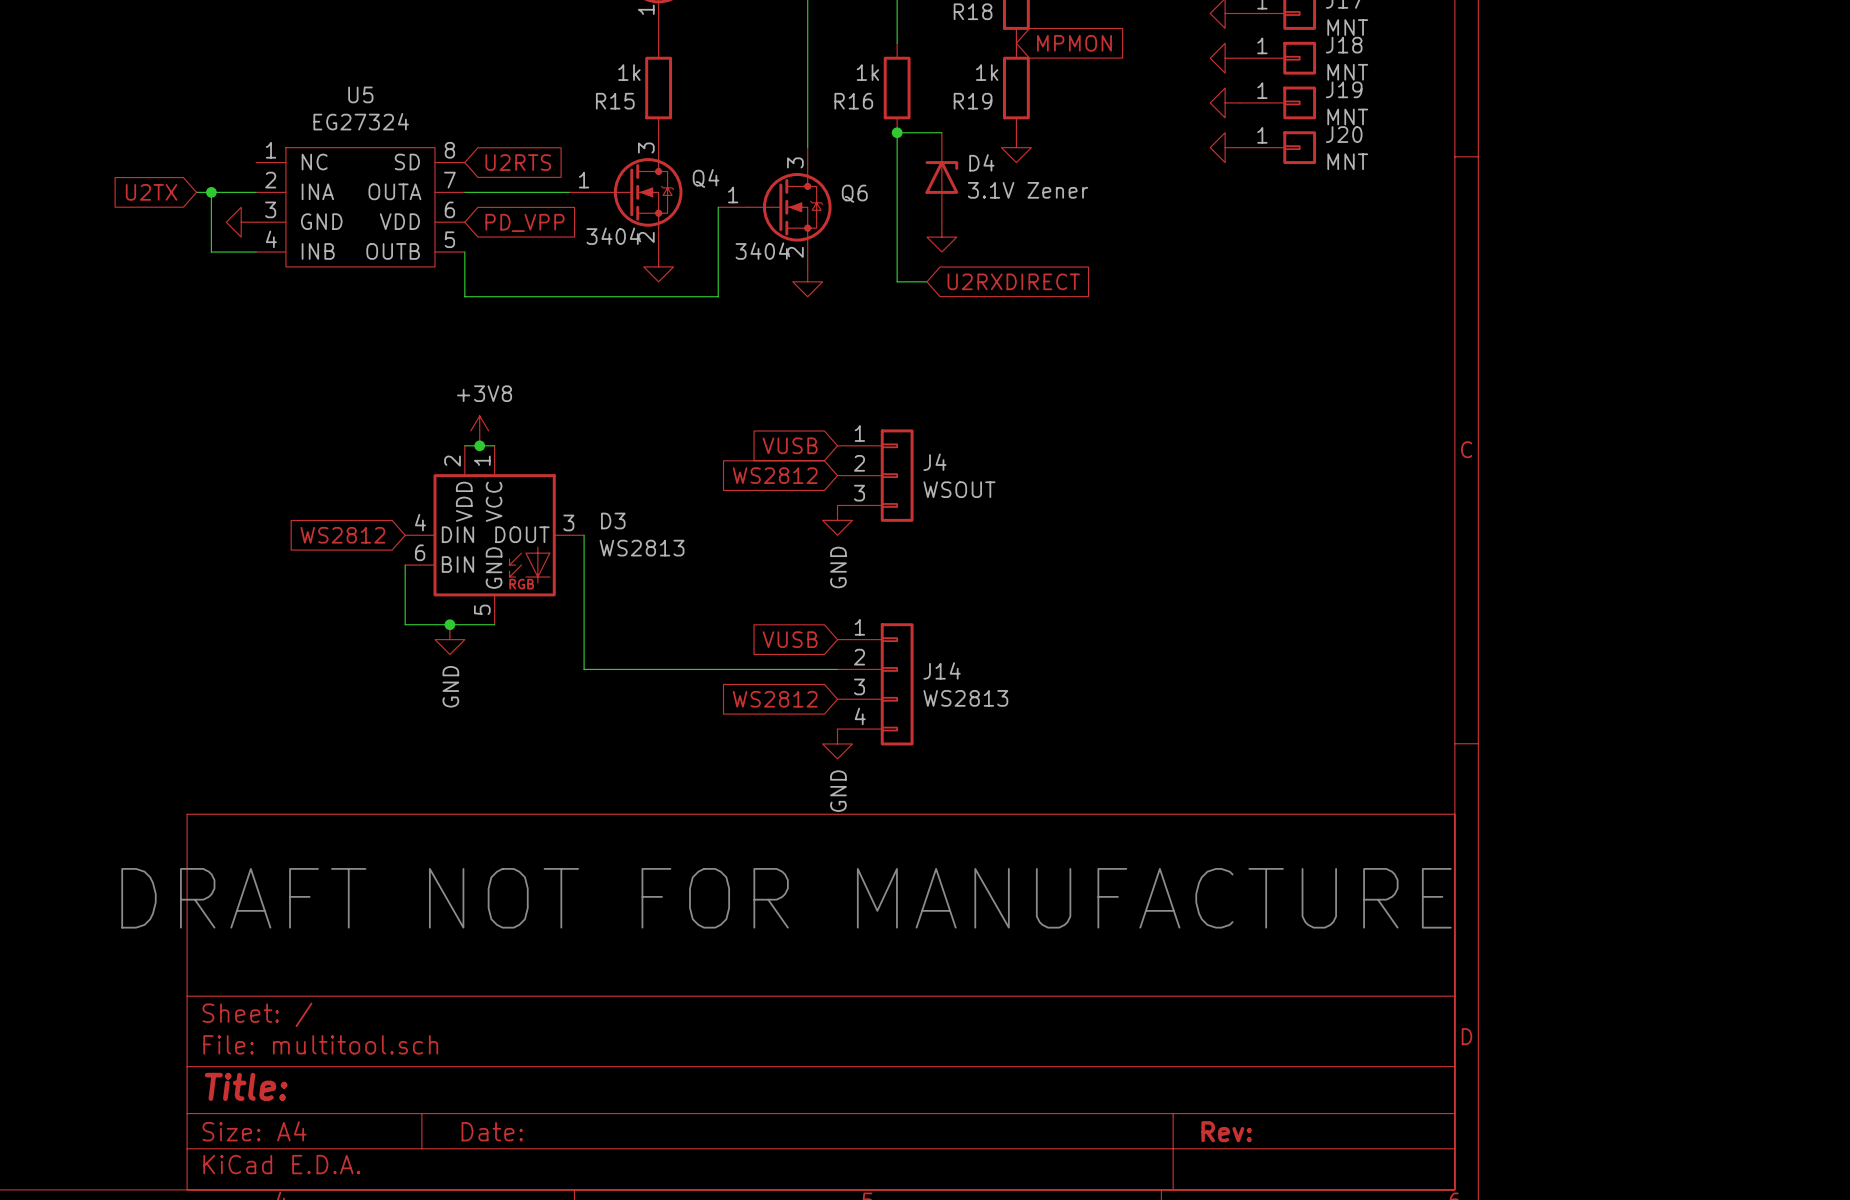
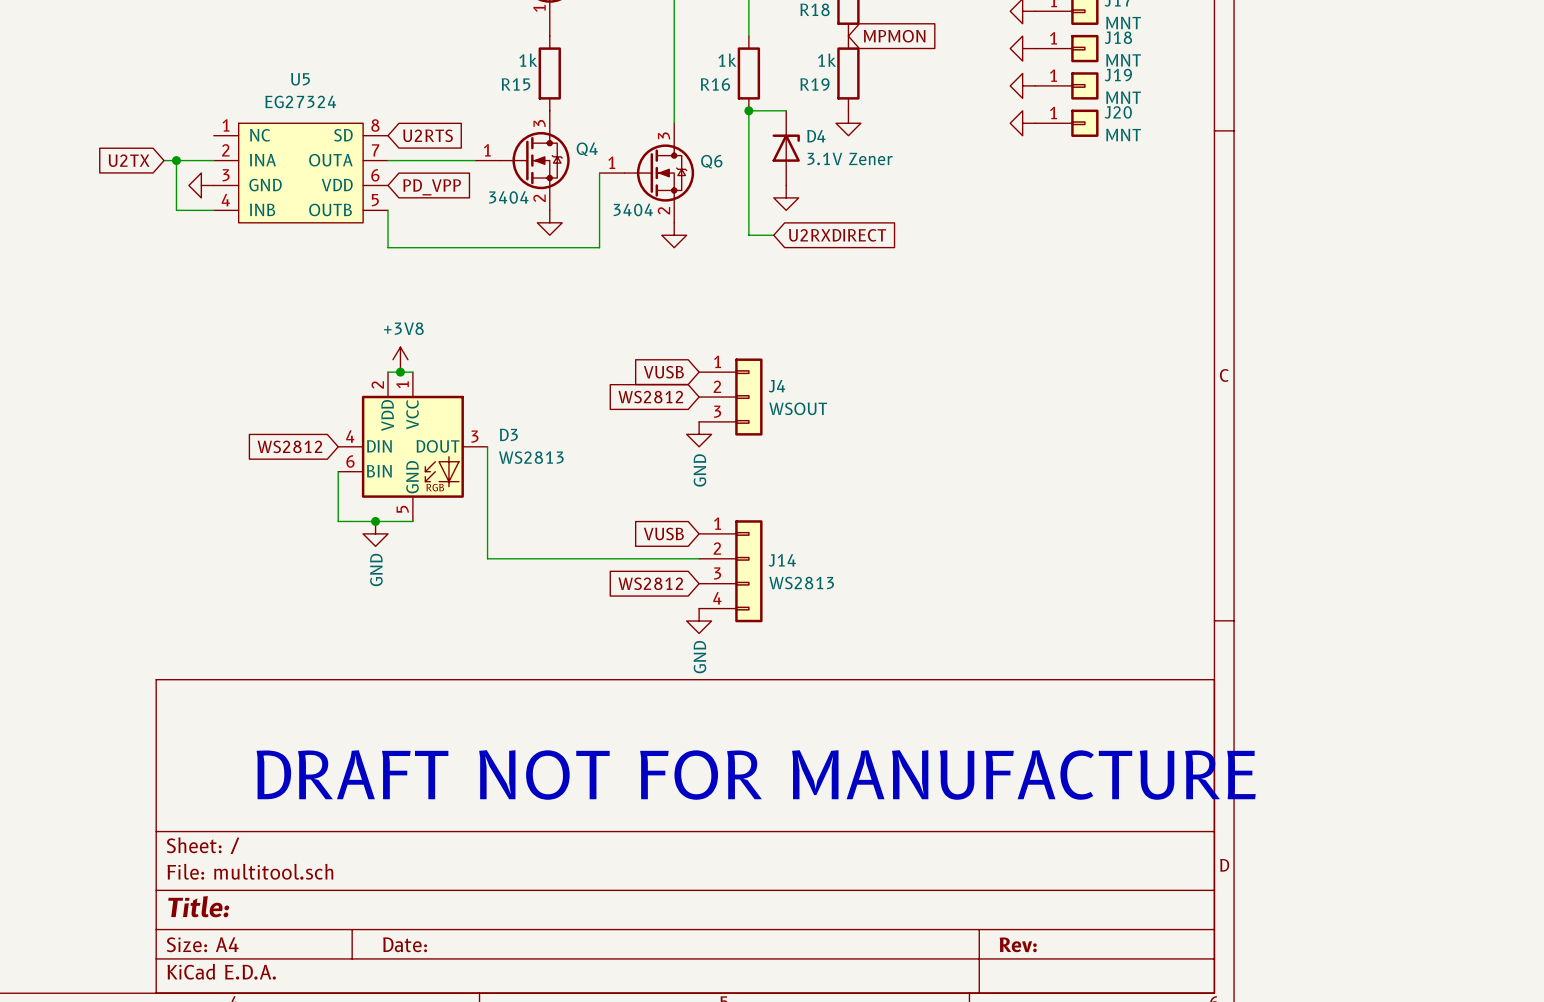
text position: DRAFT NOT FOR MANUFACTURE (786, 898) -> DRAFT NOT FOR MANUFACTURE (756, 774)

